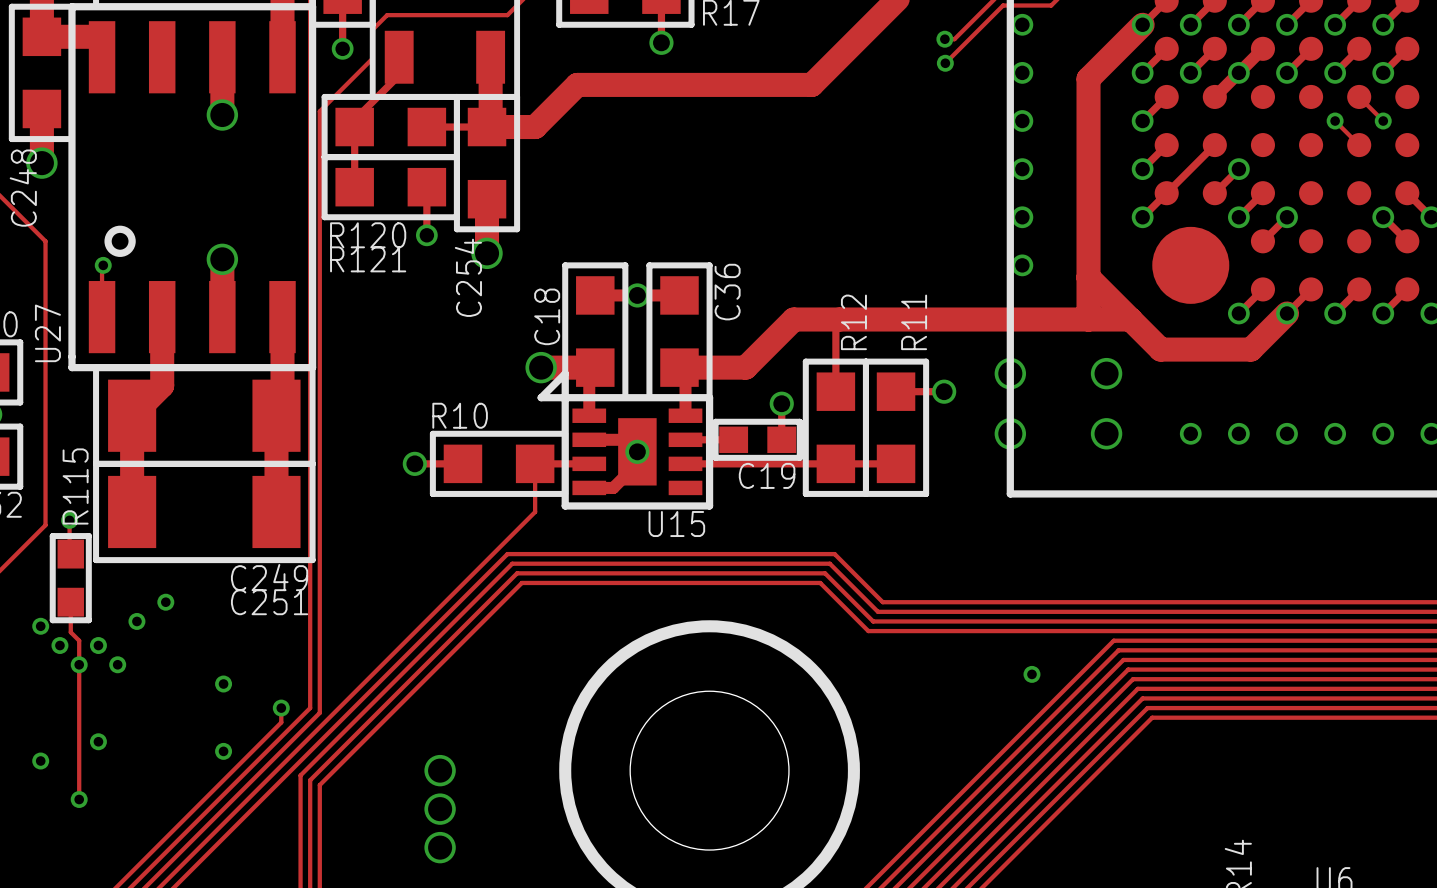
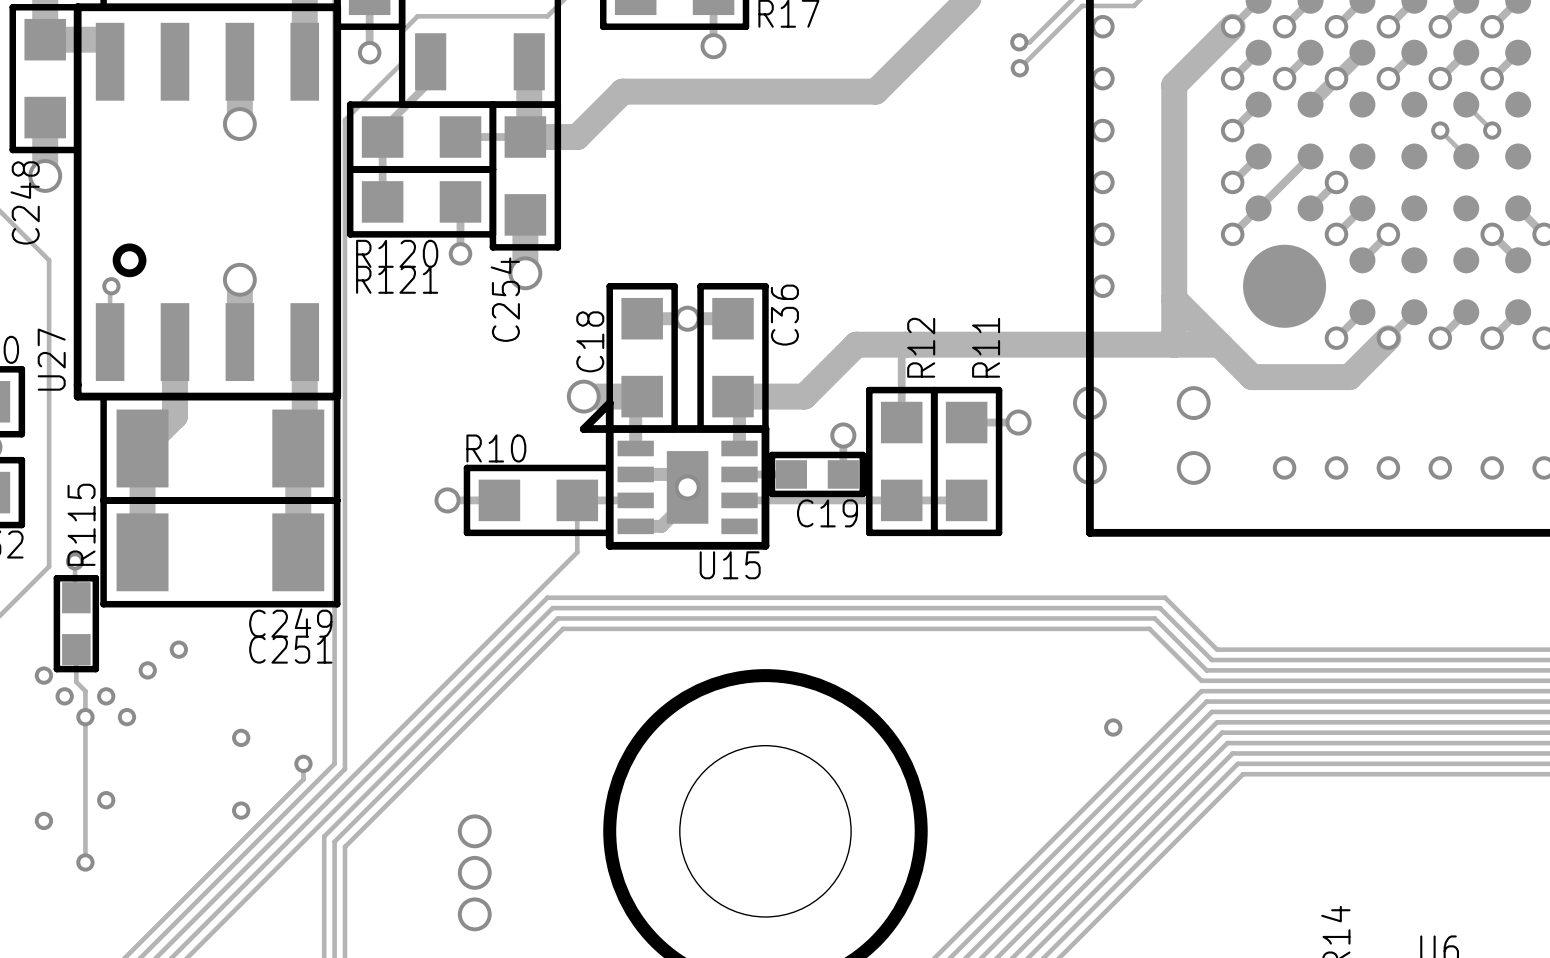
track: (834, 554) (882, 602) (1128, 602) -> (900, 597) (1165, 597) (1217, 649)
track: (829, 563) (877, 611) (1123, 611) -> (895, 608) (1159, 608) (1211, 660)
track: (825, 573) (873, 621) (1118, 621) -> (890, 618) (1154, 618) (1206, 670)
track: (820, 582) (868, 631) (1113, 631) -> (884, 628) (1149, 628) (1201, 680)

